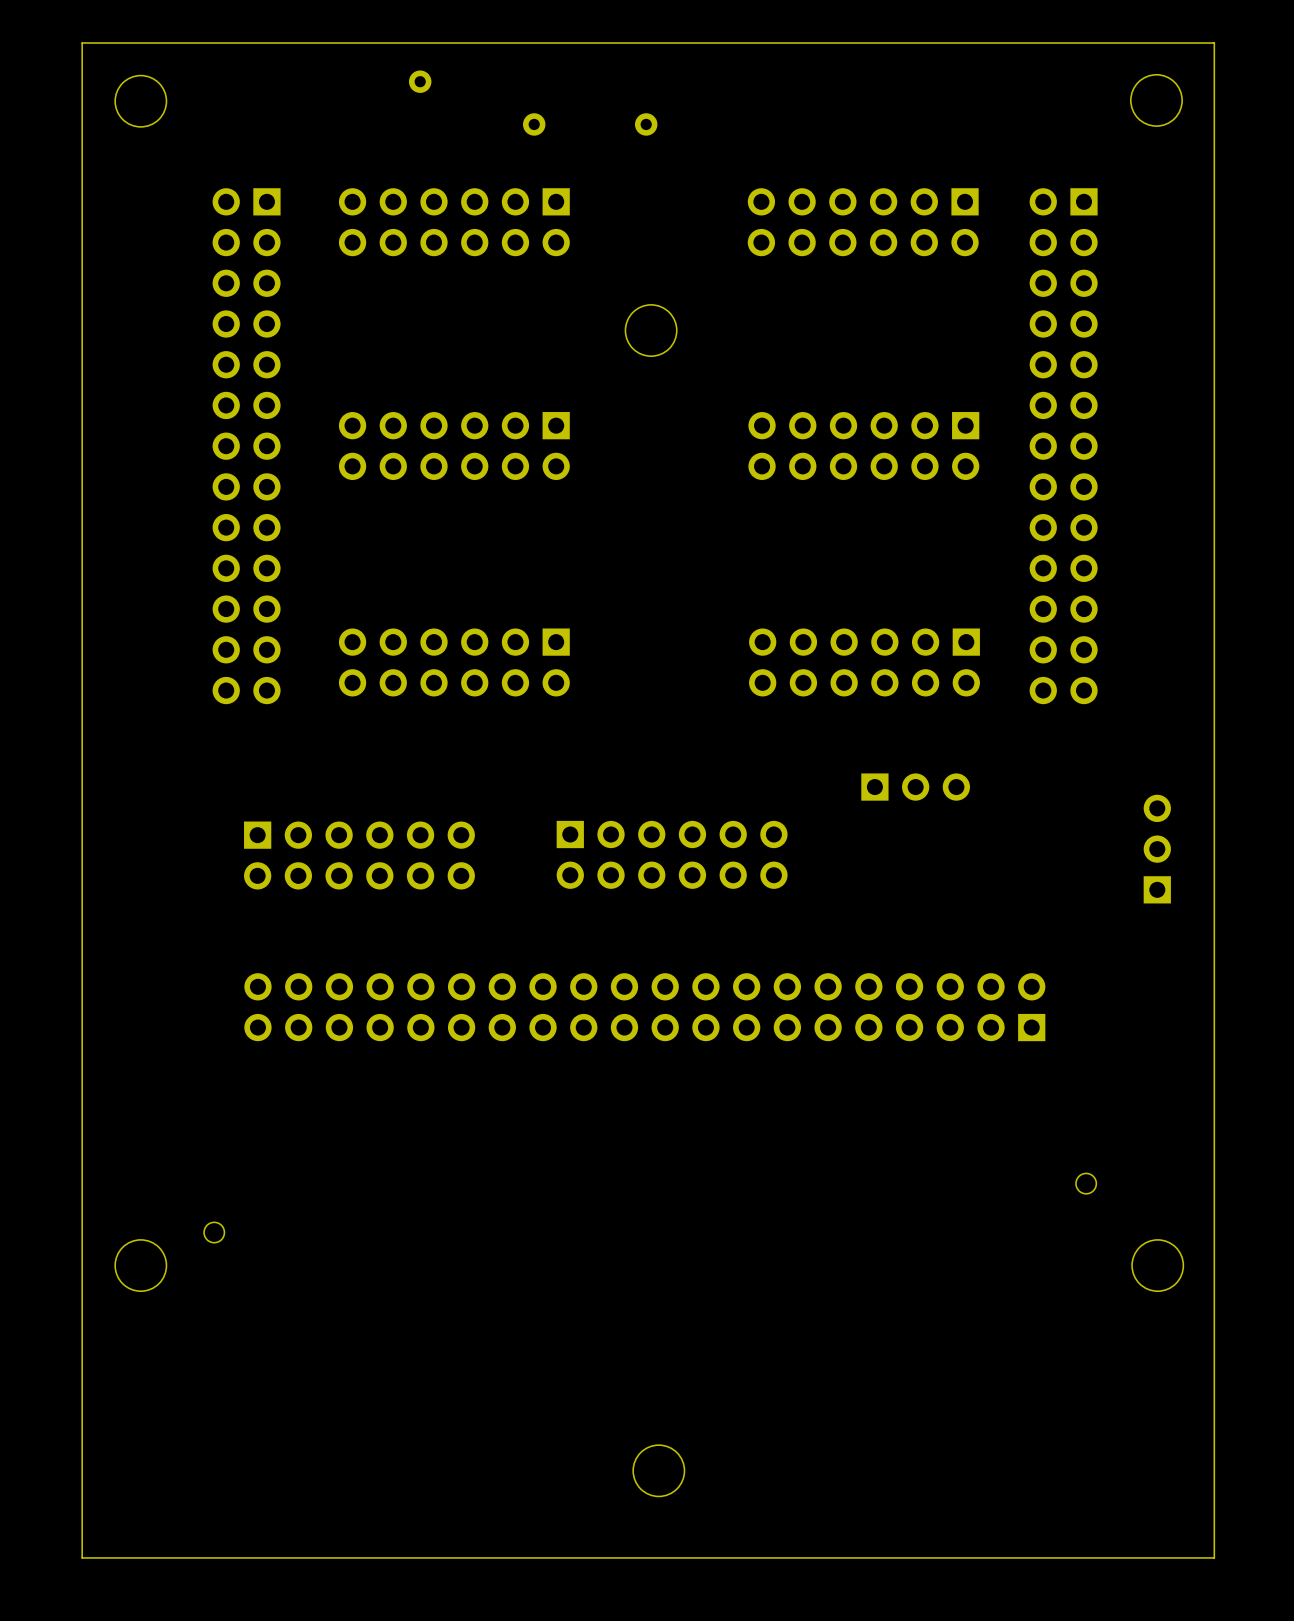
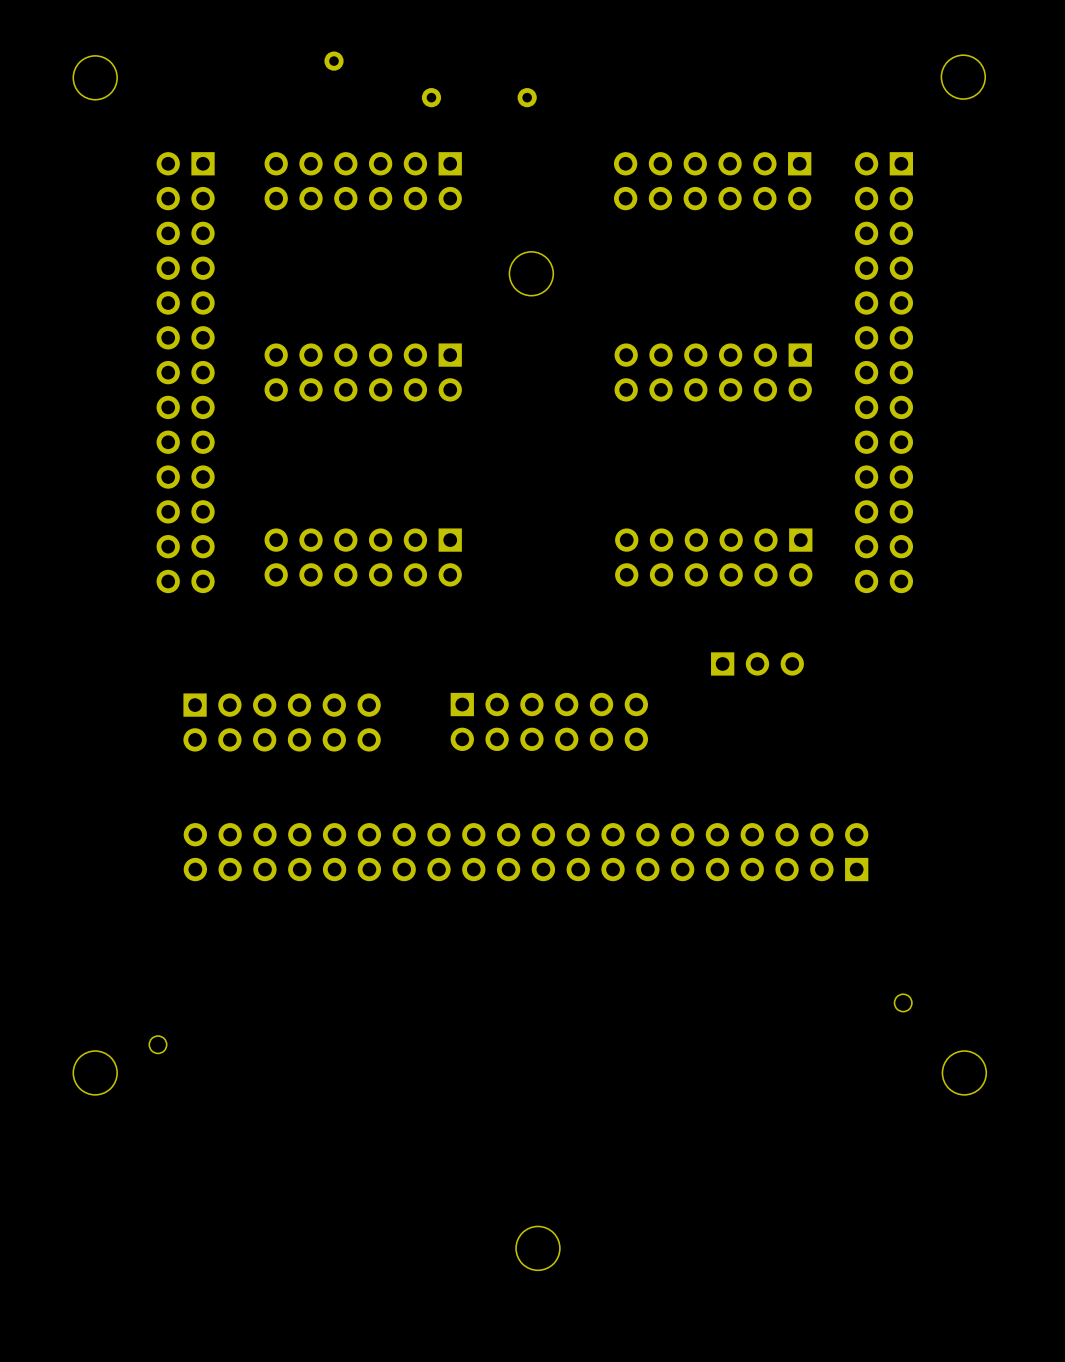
board edge: (1214, 43) (82, 43) (82, 1557) (1214, 1557) (1214, 43) -> none
part: (1157, 849) -> none

